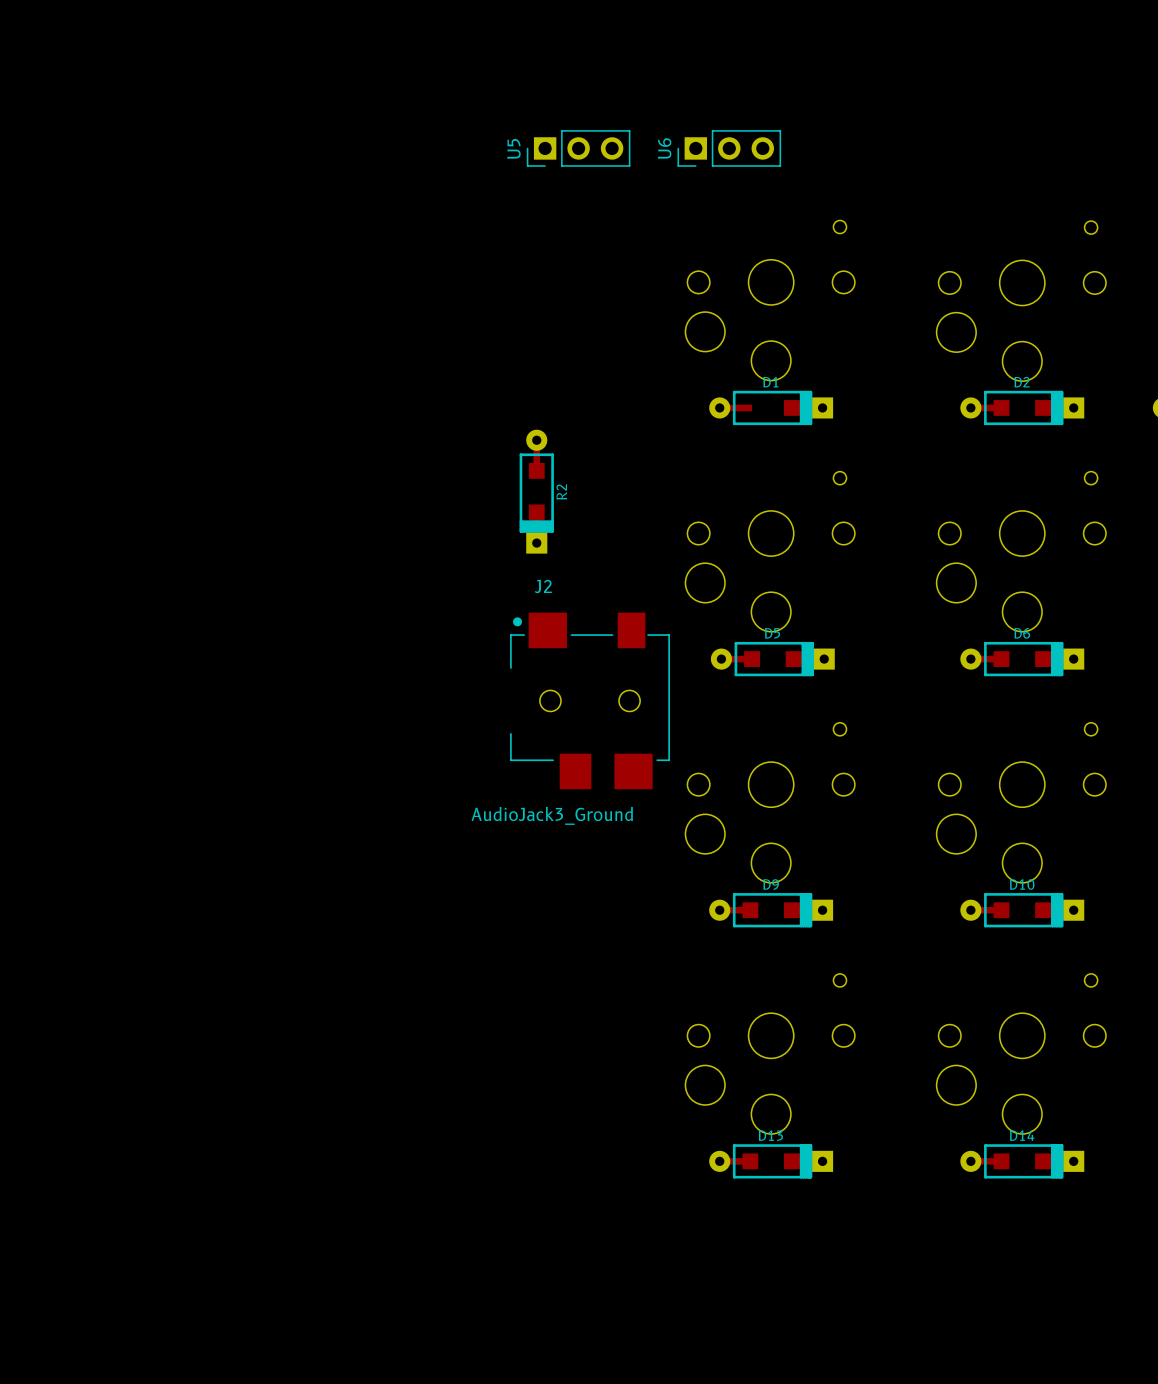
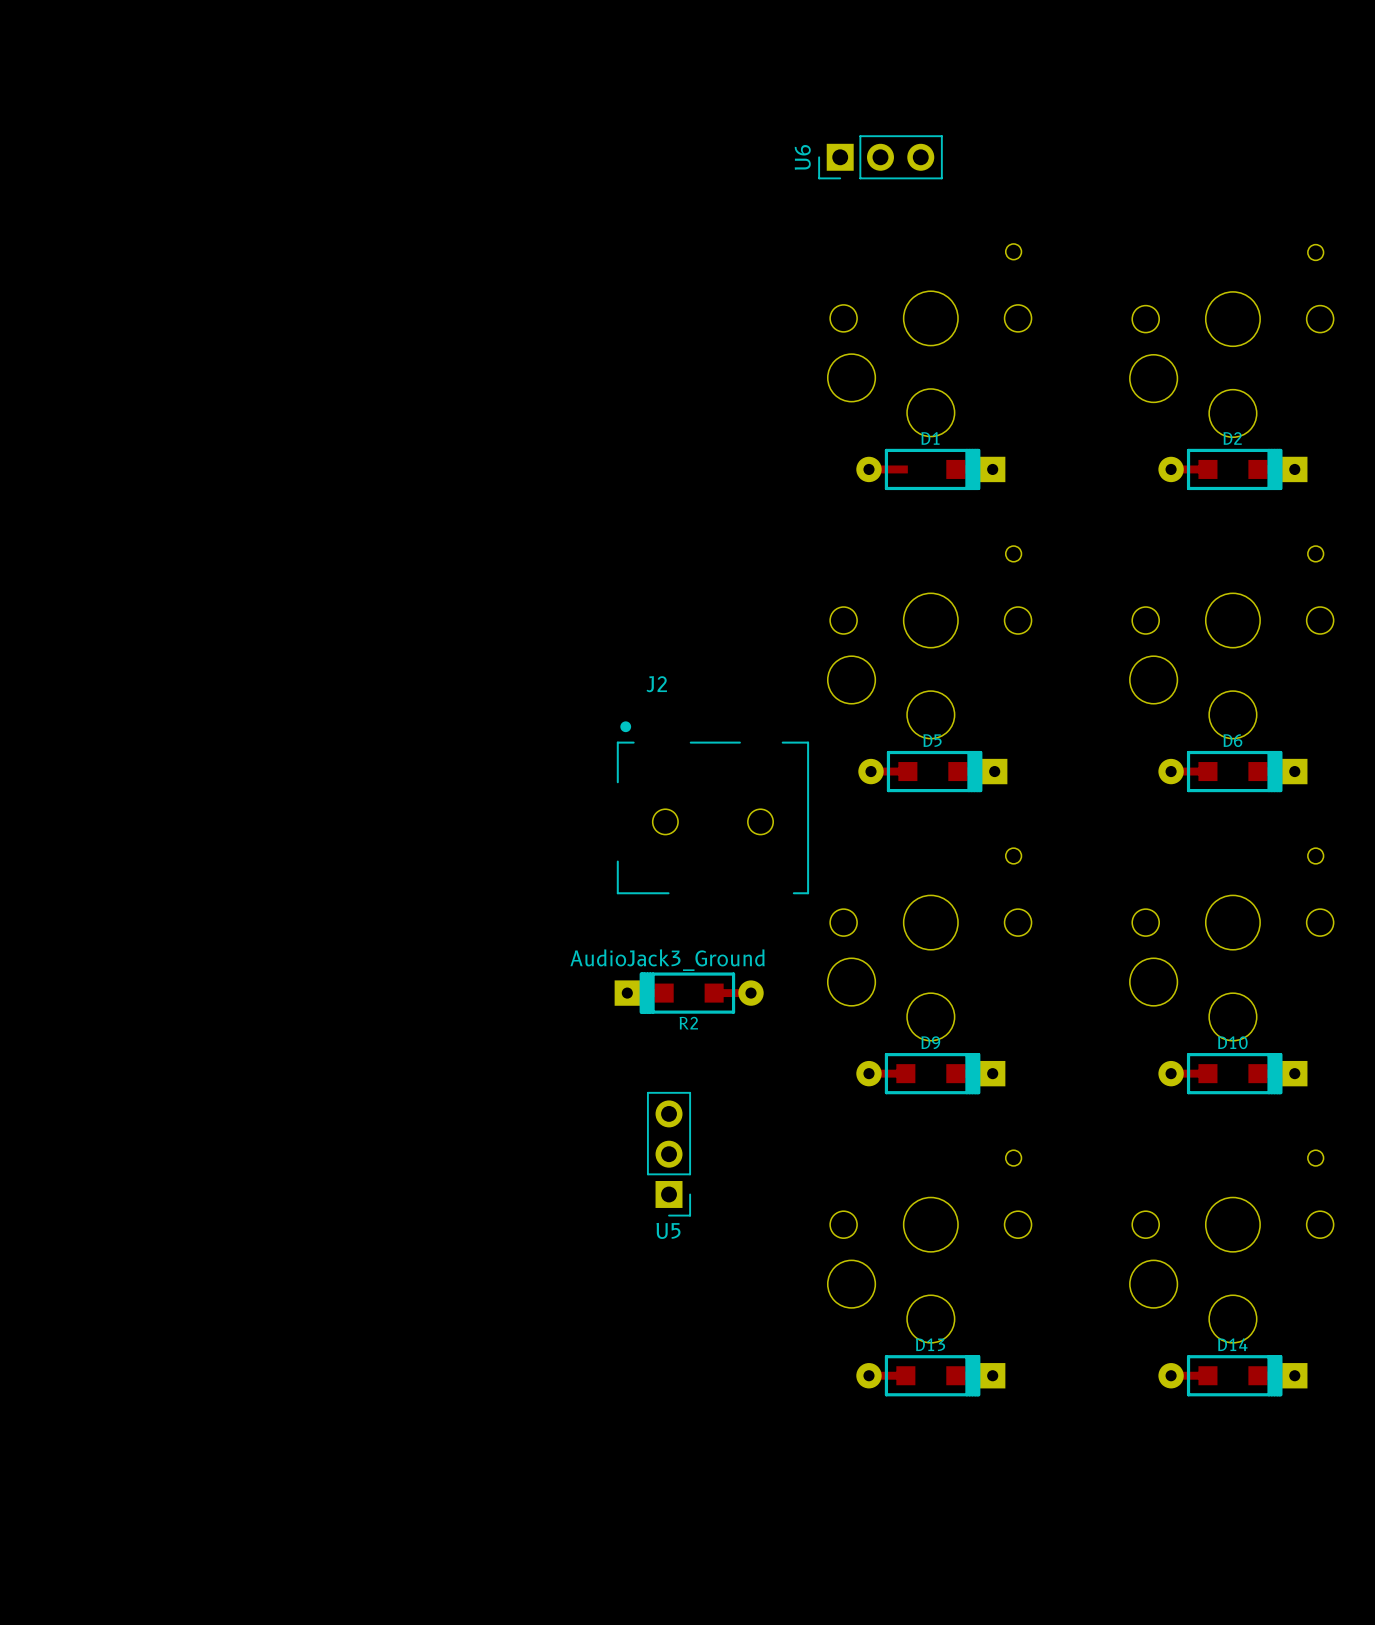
U5 rotation: 0° (578, 148) -> 90° counterclockwise (669, 1154)
U5 position: (578, 148) -> (669, 1154)
R2 rotation: 0° (536, 491) -> 90° clockwise (689, 993)
R2 position: (536, 491) -> (689, 993)
J2 footprint: [510, 612, 670, 790] -> [616, 721, 810, 895]

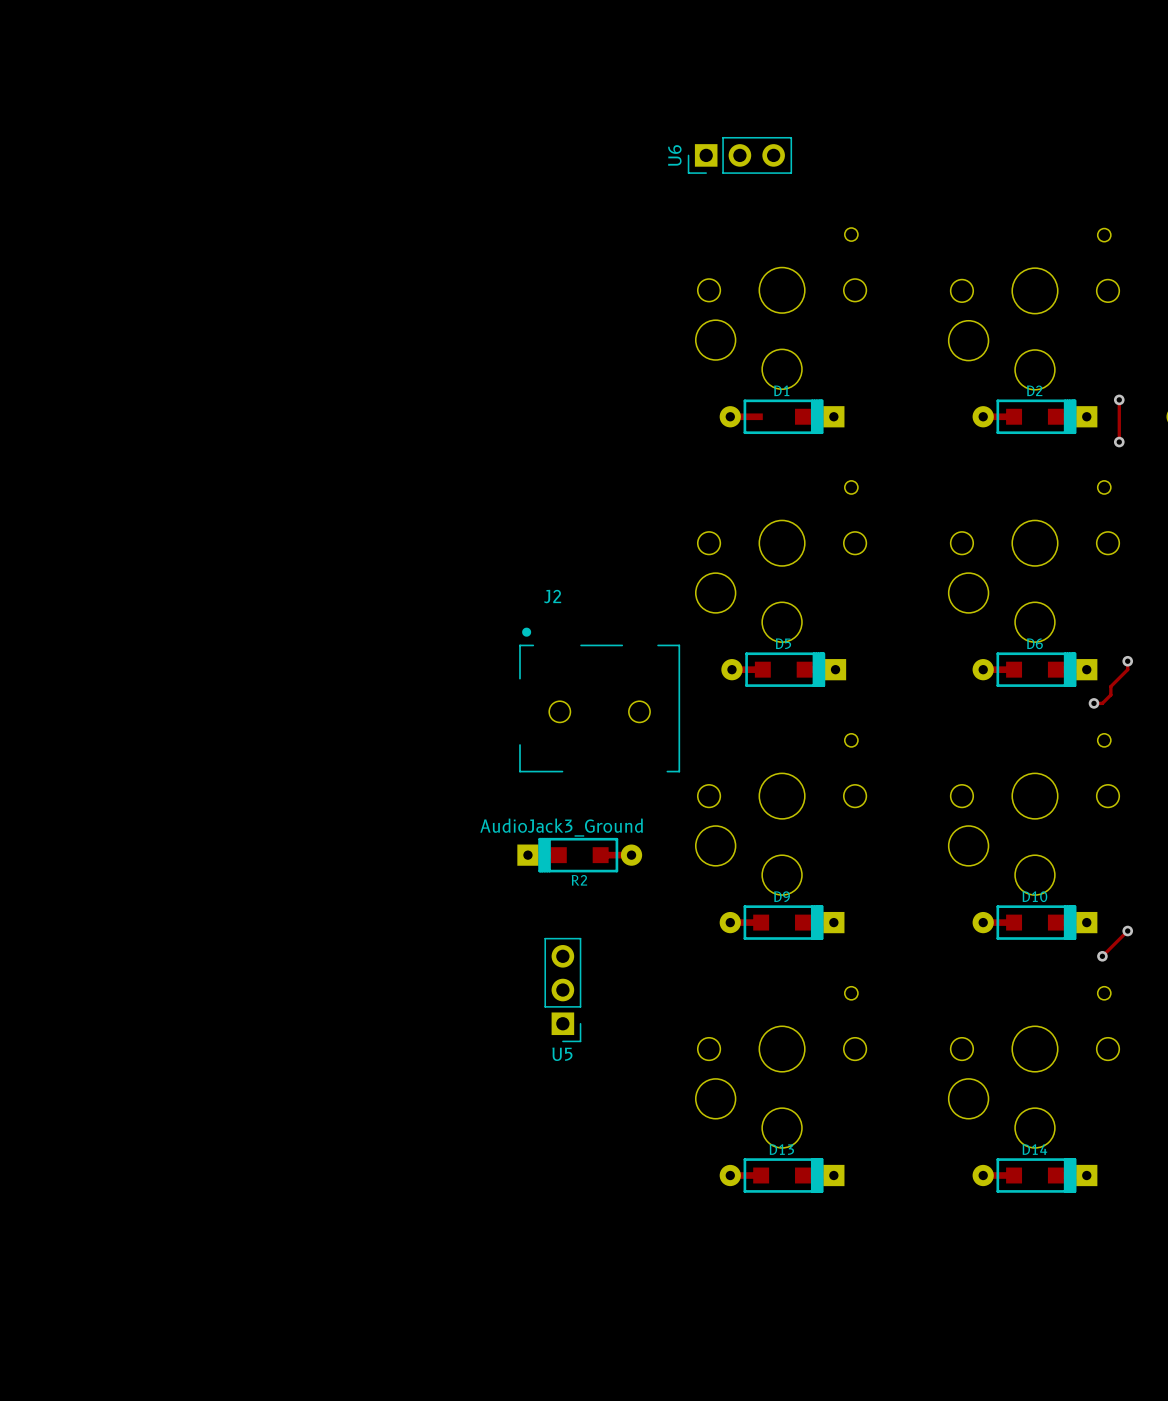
track: none -> (1119, 399) (1119, 442)
via: none -> (1119, 399)
via: none -> (1119, 442)
track: none -> (1127, 661) (1127, 669) (1110, 686) (1110, 694) (1102, 703) (1093, 703)
via: none -> (1127, 661)
via: none -> (1093, 703)
track: none -> (1127, 931) (1102, 956)
via: none -> (1127, 931)
via: none -> (1102, 956)

